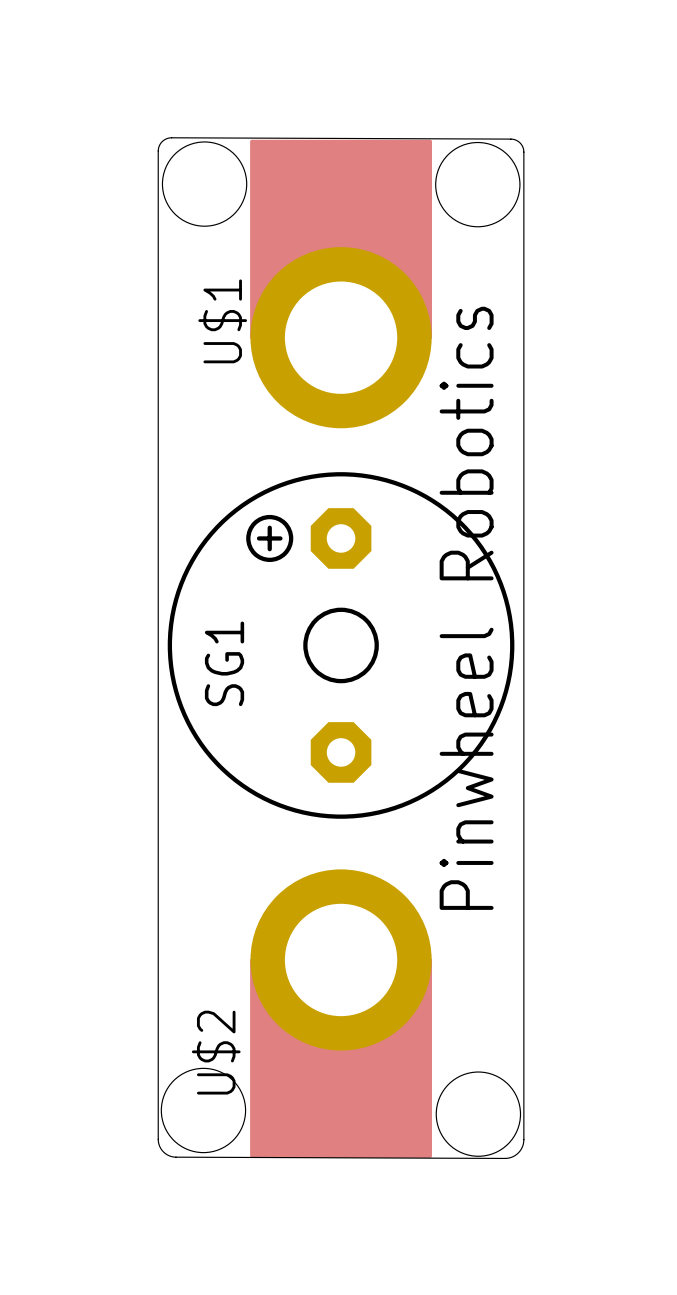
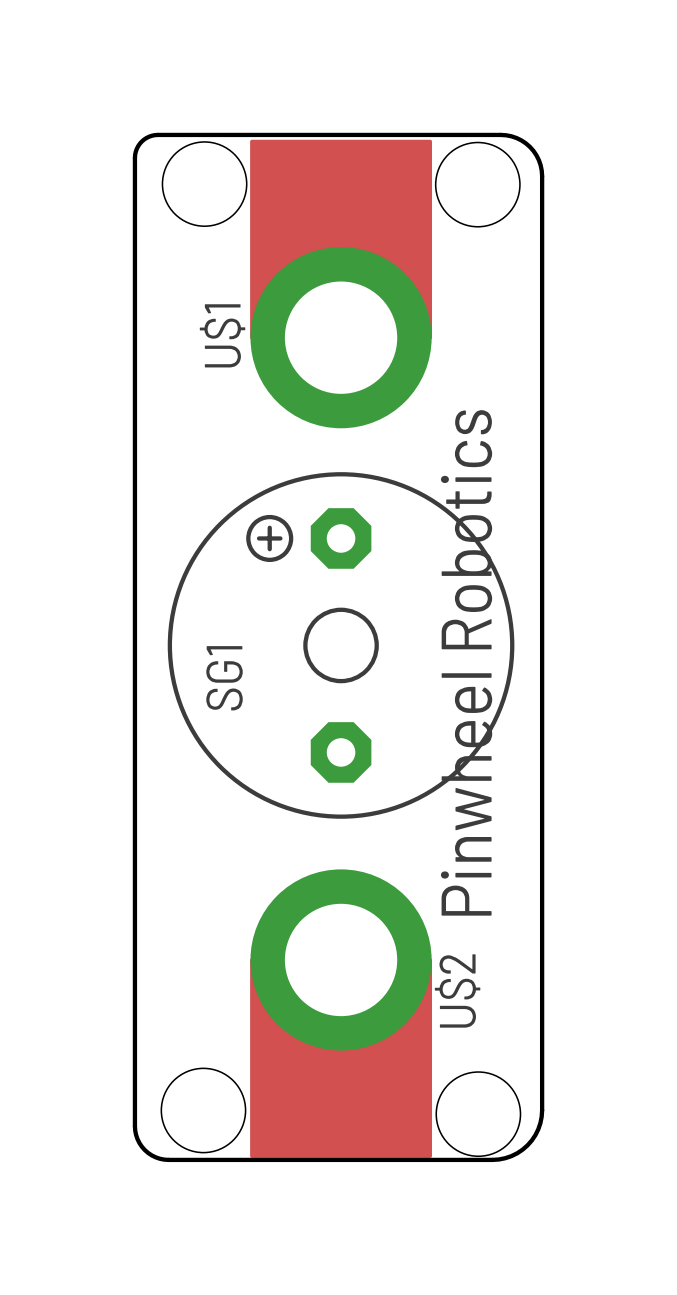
board edge: (171, 137) (510, 139) (518, 141) (523, 148) (523, 1139) (520, 1149) (511, 1157) (176, 1157) (165, 1153) (158, 1143) (158, 151) (162, 141) (171, 137) -> (157, 134) (149, 136) (141, 141) (136, 149) (134, 157) (134, 1126) (137, 1139) (148, 1152) (159, 1158) (168, 1159) (492, 1159) (511, 1156) (522, 1149) (535, 1135) (540, 1123) (542, 1110) (542, 176) (538, 160) (525, 143) (506, 135) (157, 134)
U$2 name position: U$2 (216, 1052) -> U$2 (457, 990)

